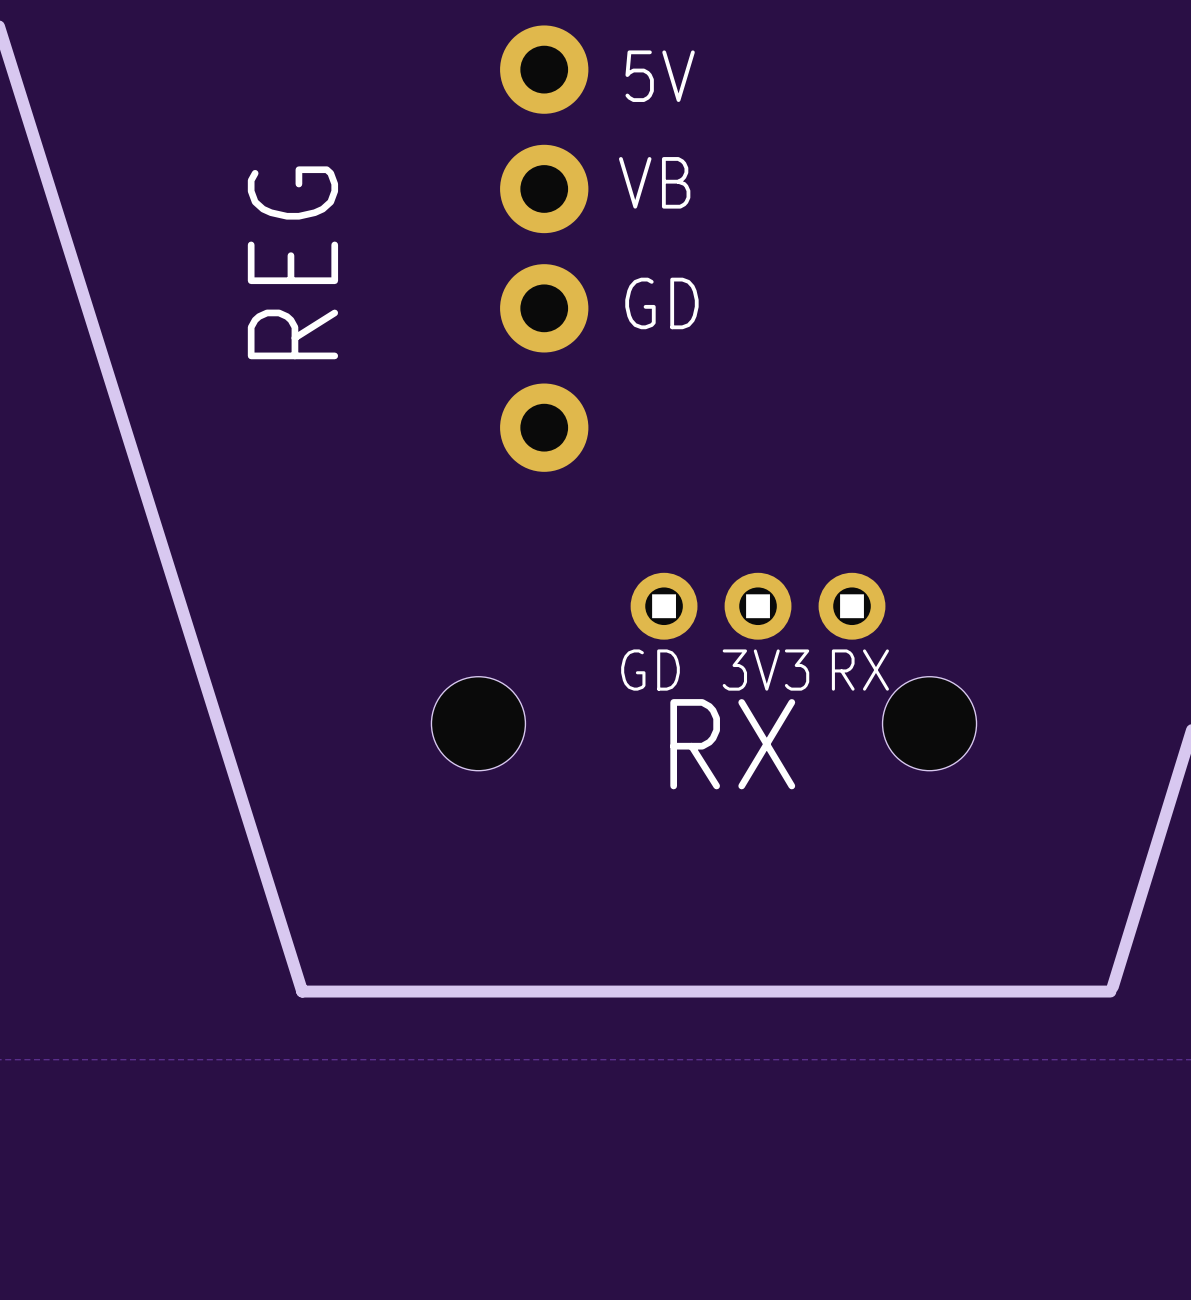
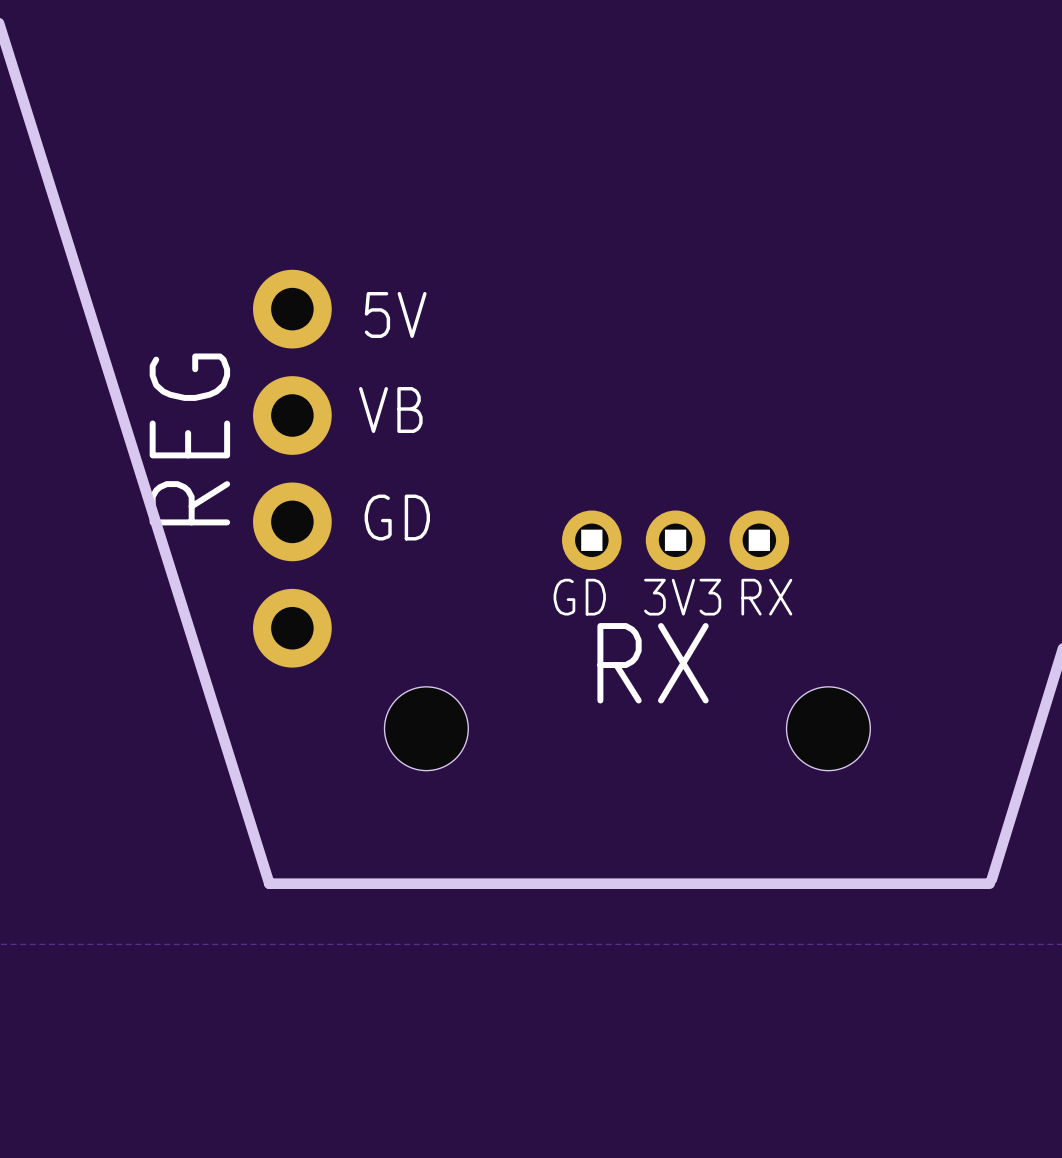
text position: 5V (660, 76) -> 5V (395, 314)
text position: VB (654, 182) -> VB (390, 410)
part position: (544, 248) -> (292, 468)
text position: REG (292, 262) -> REG (189, 439)
text position: GD (661, 303) -> GD (397, 517)
hole position: (478, 723) -> (426, 728)
hole position: (929, 723) -> (828, 728)

